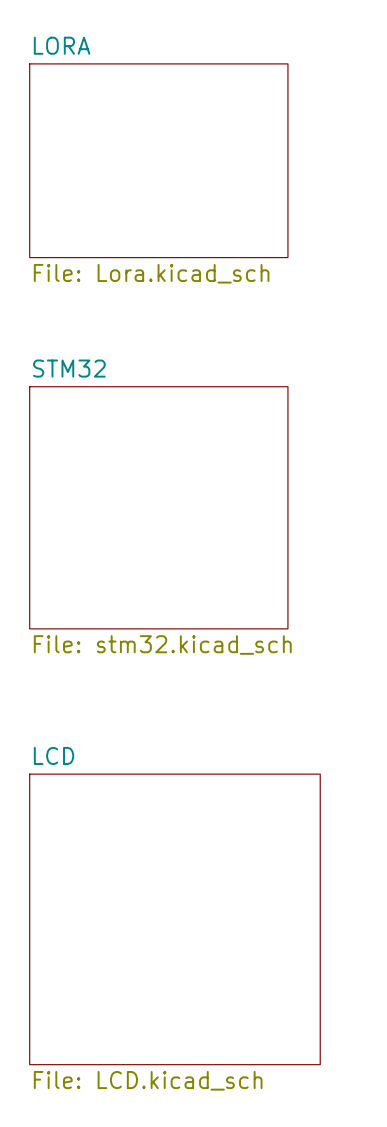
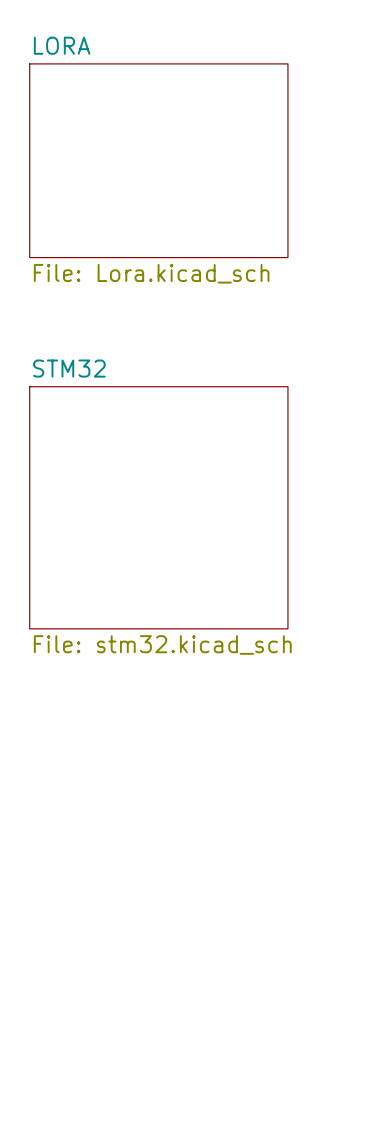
sheet LCD: File: LCD.kicad_sch (174, 919) -> none

